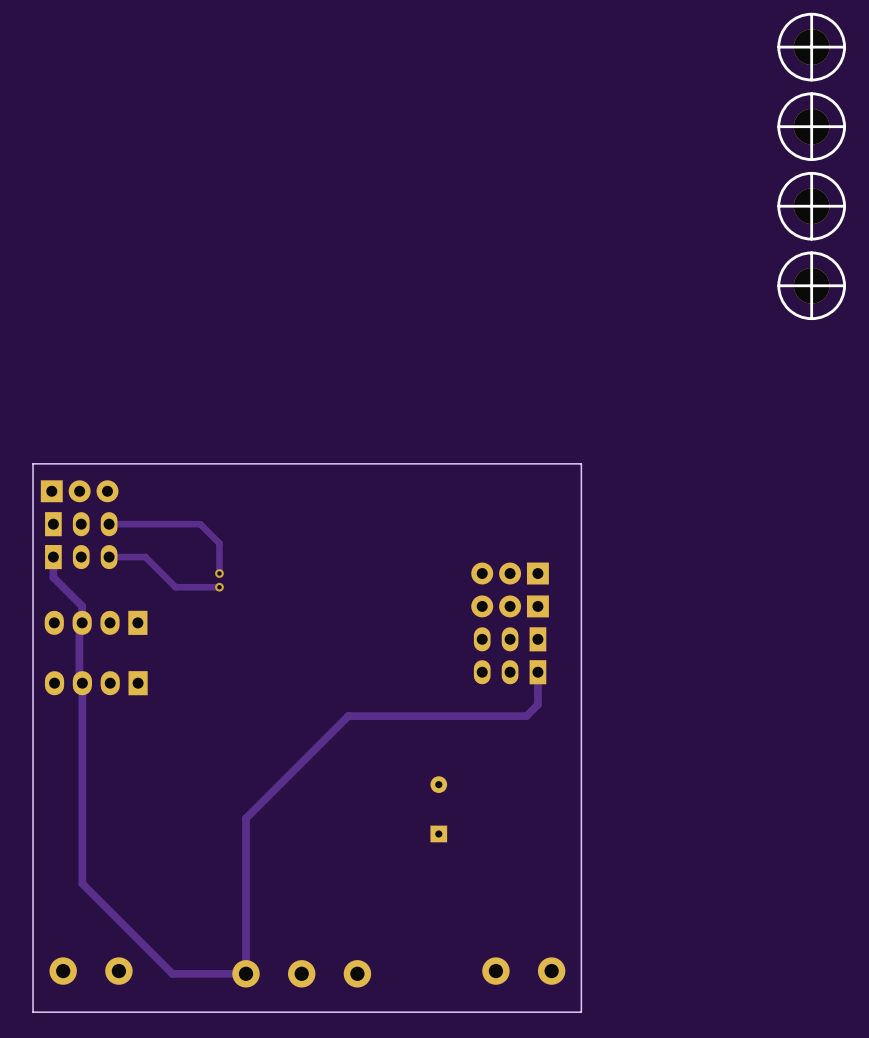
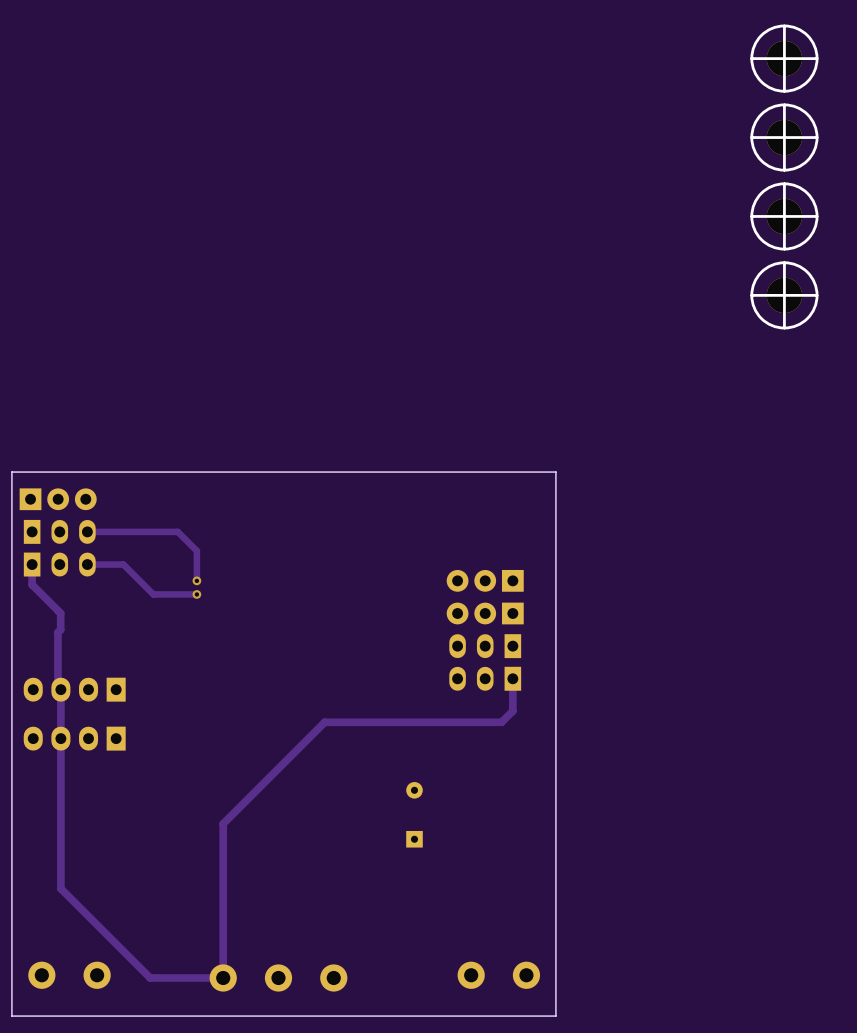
part position: (96, 622) -> (74, 738)

